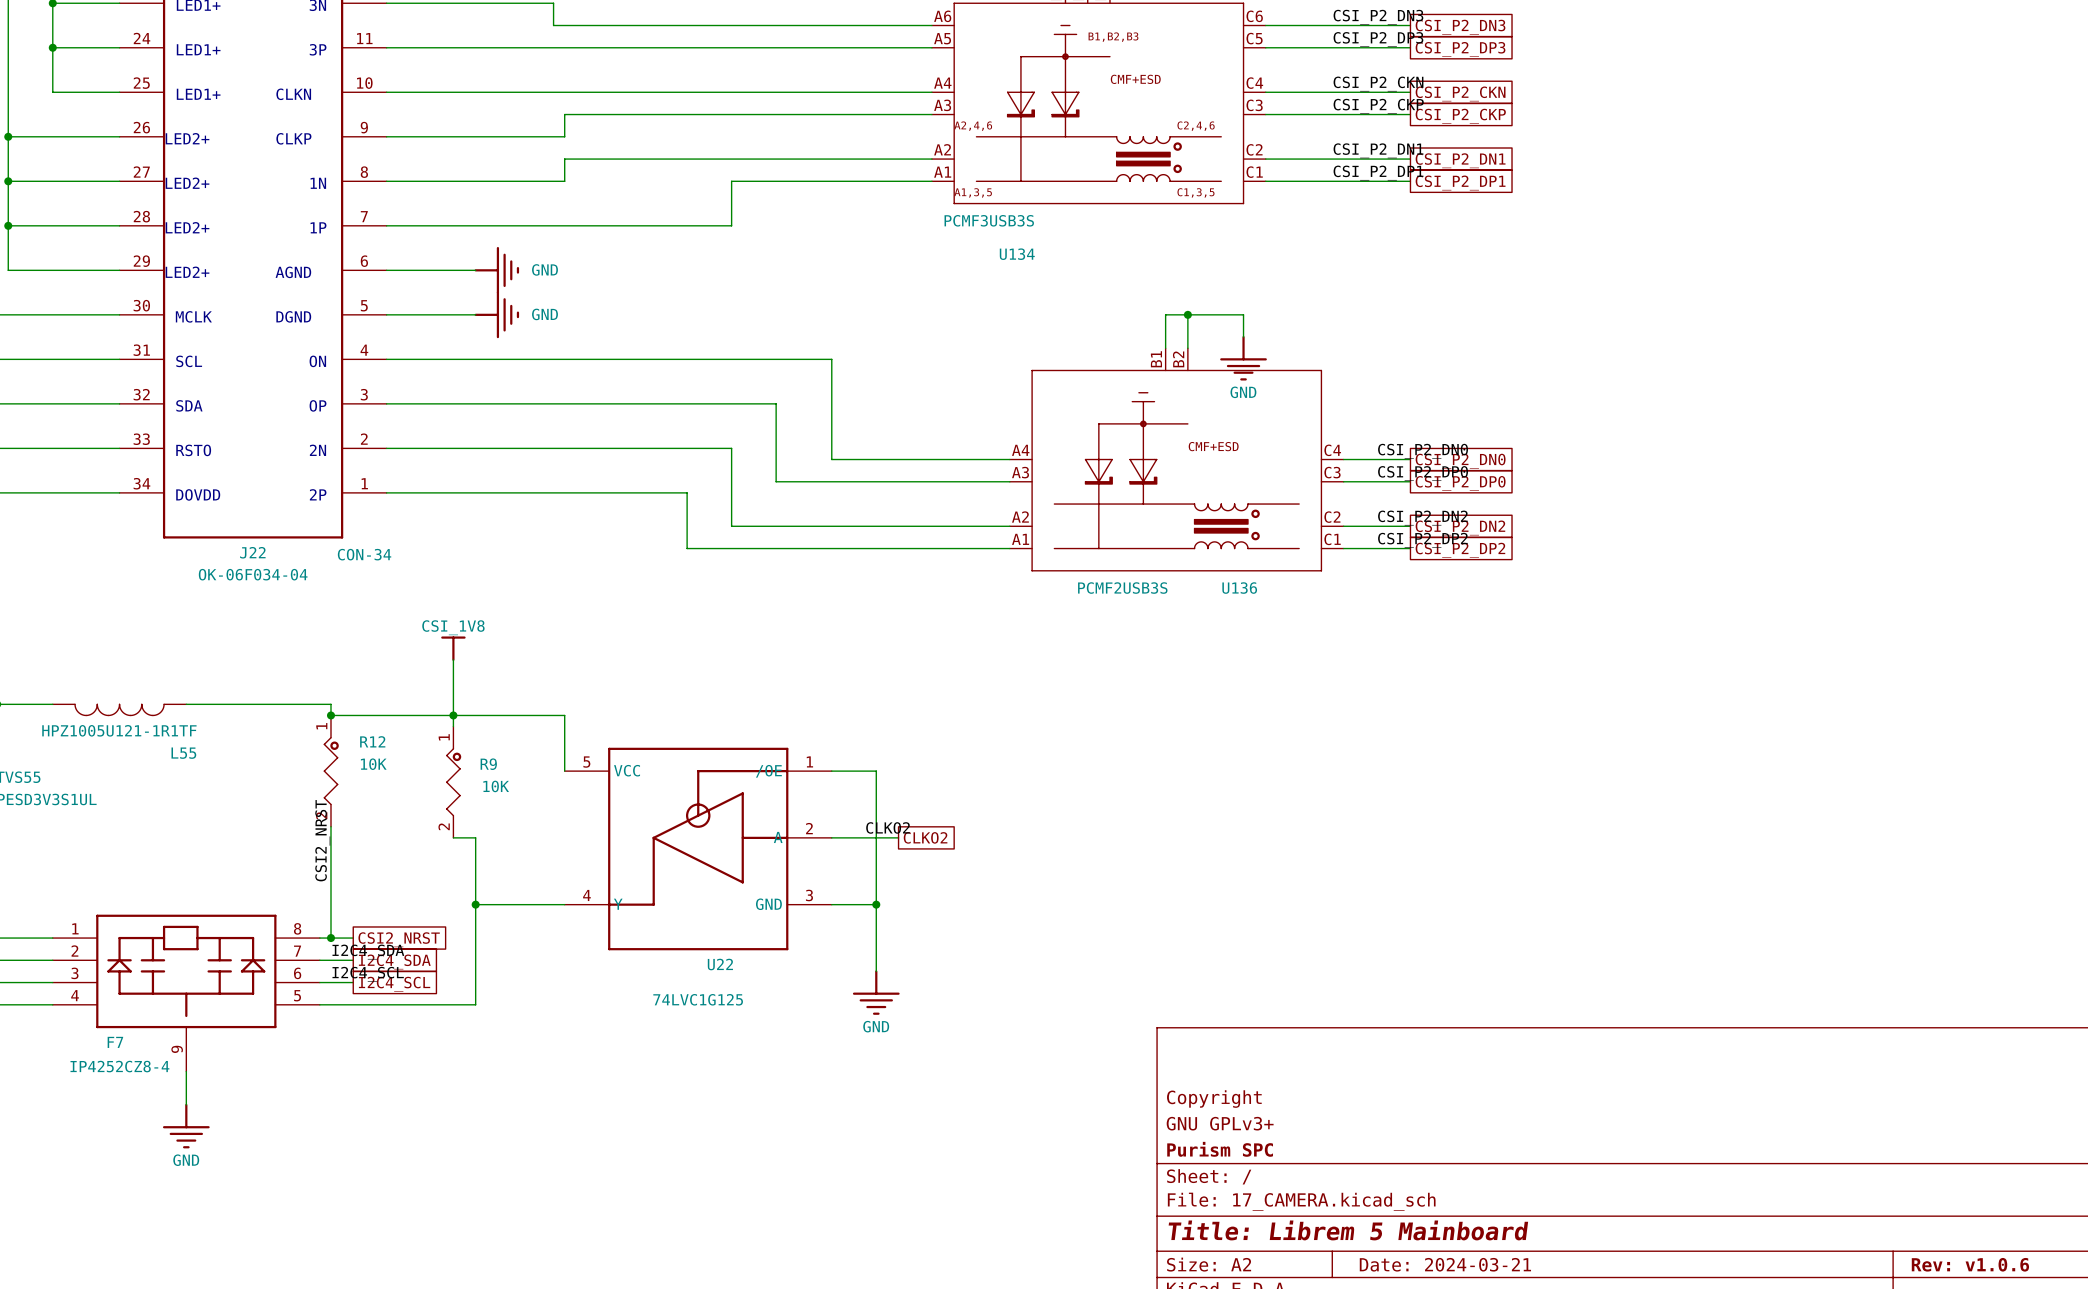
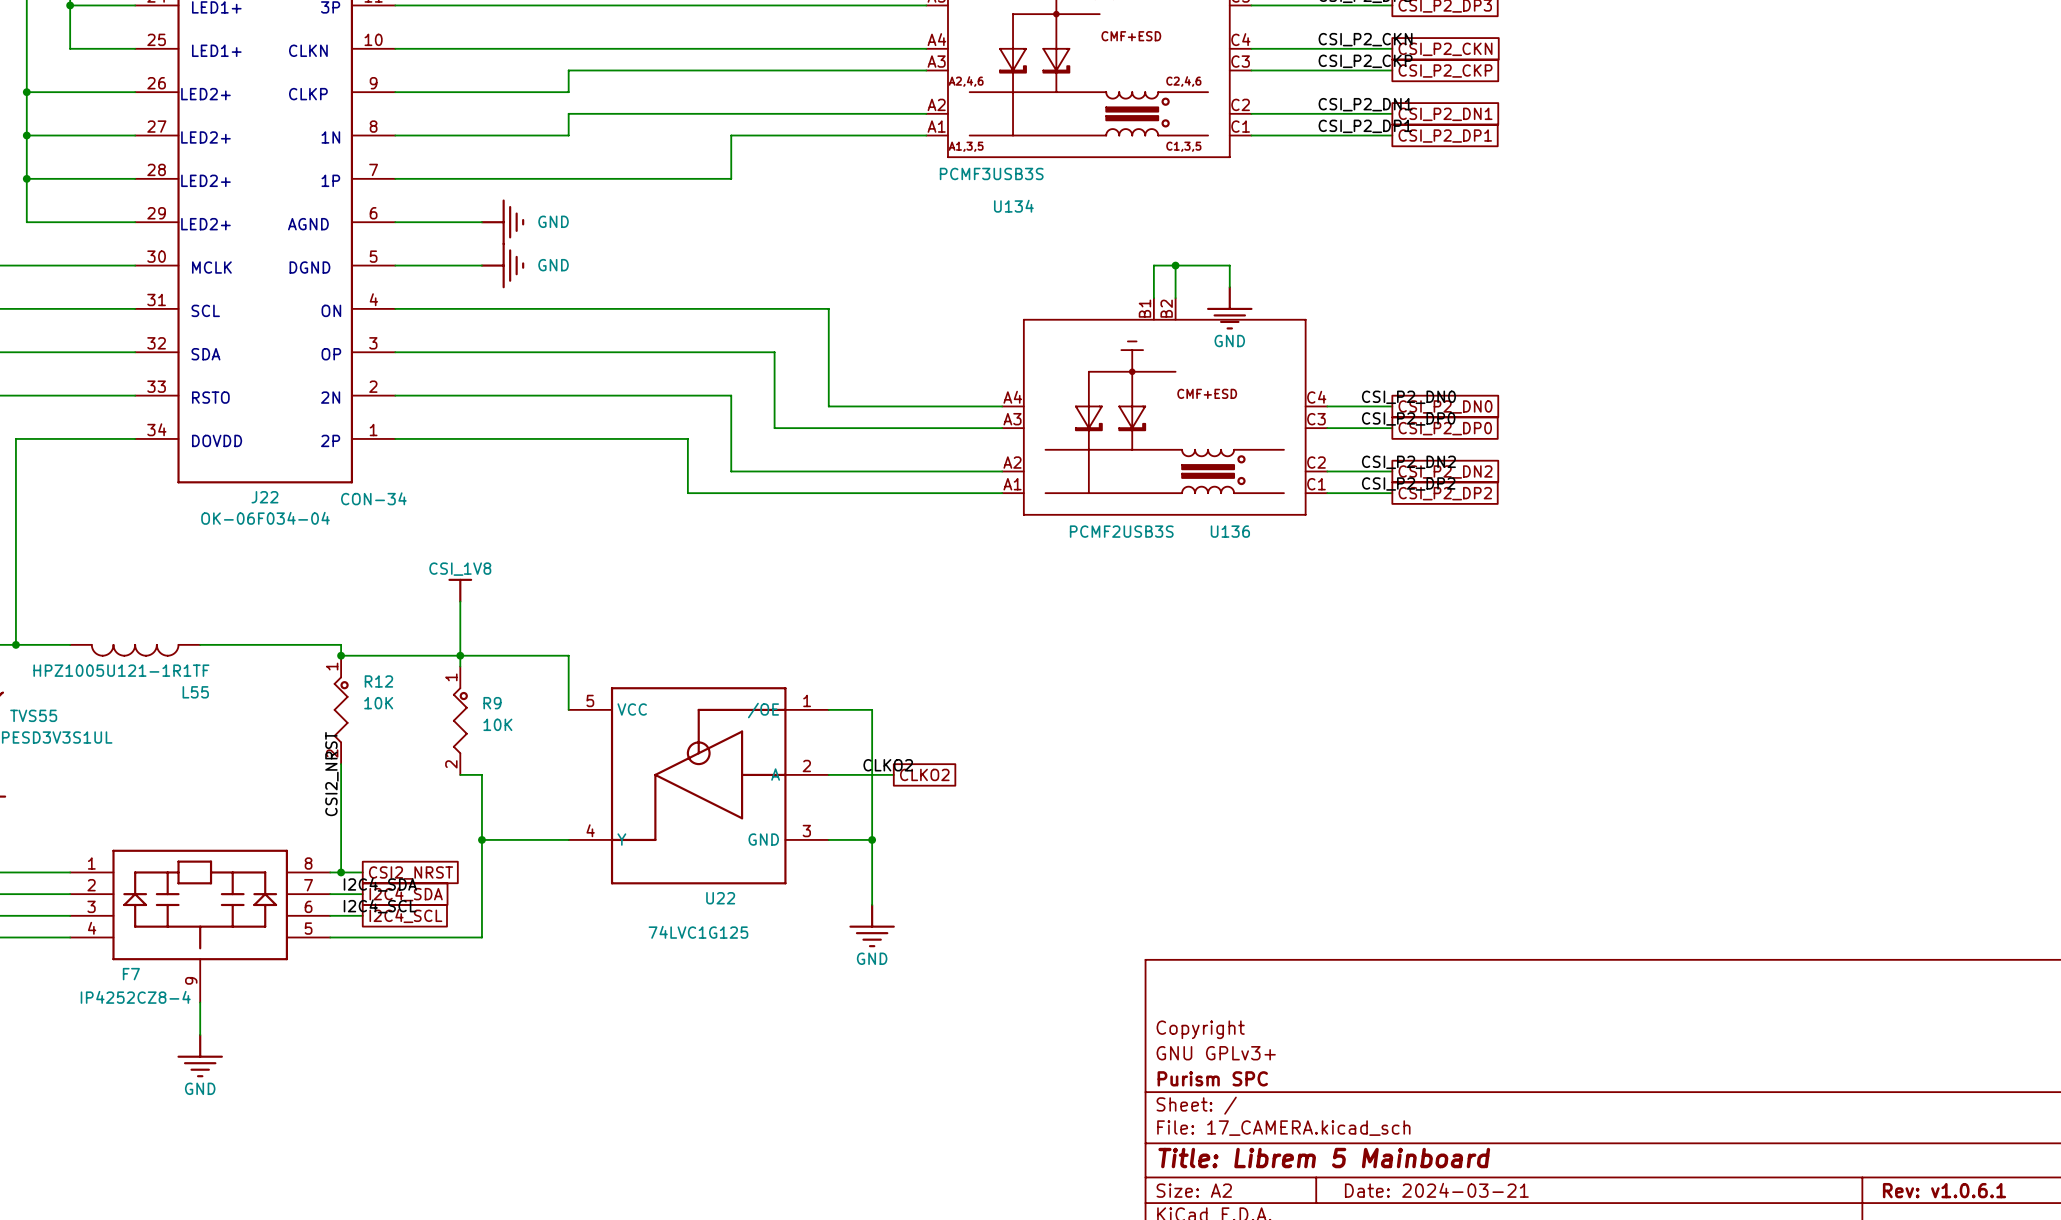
title block: Rev: v1.0.6 (1970, 1264) -> Rev: v1.0.6.1 (1944, 1190)

